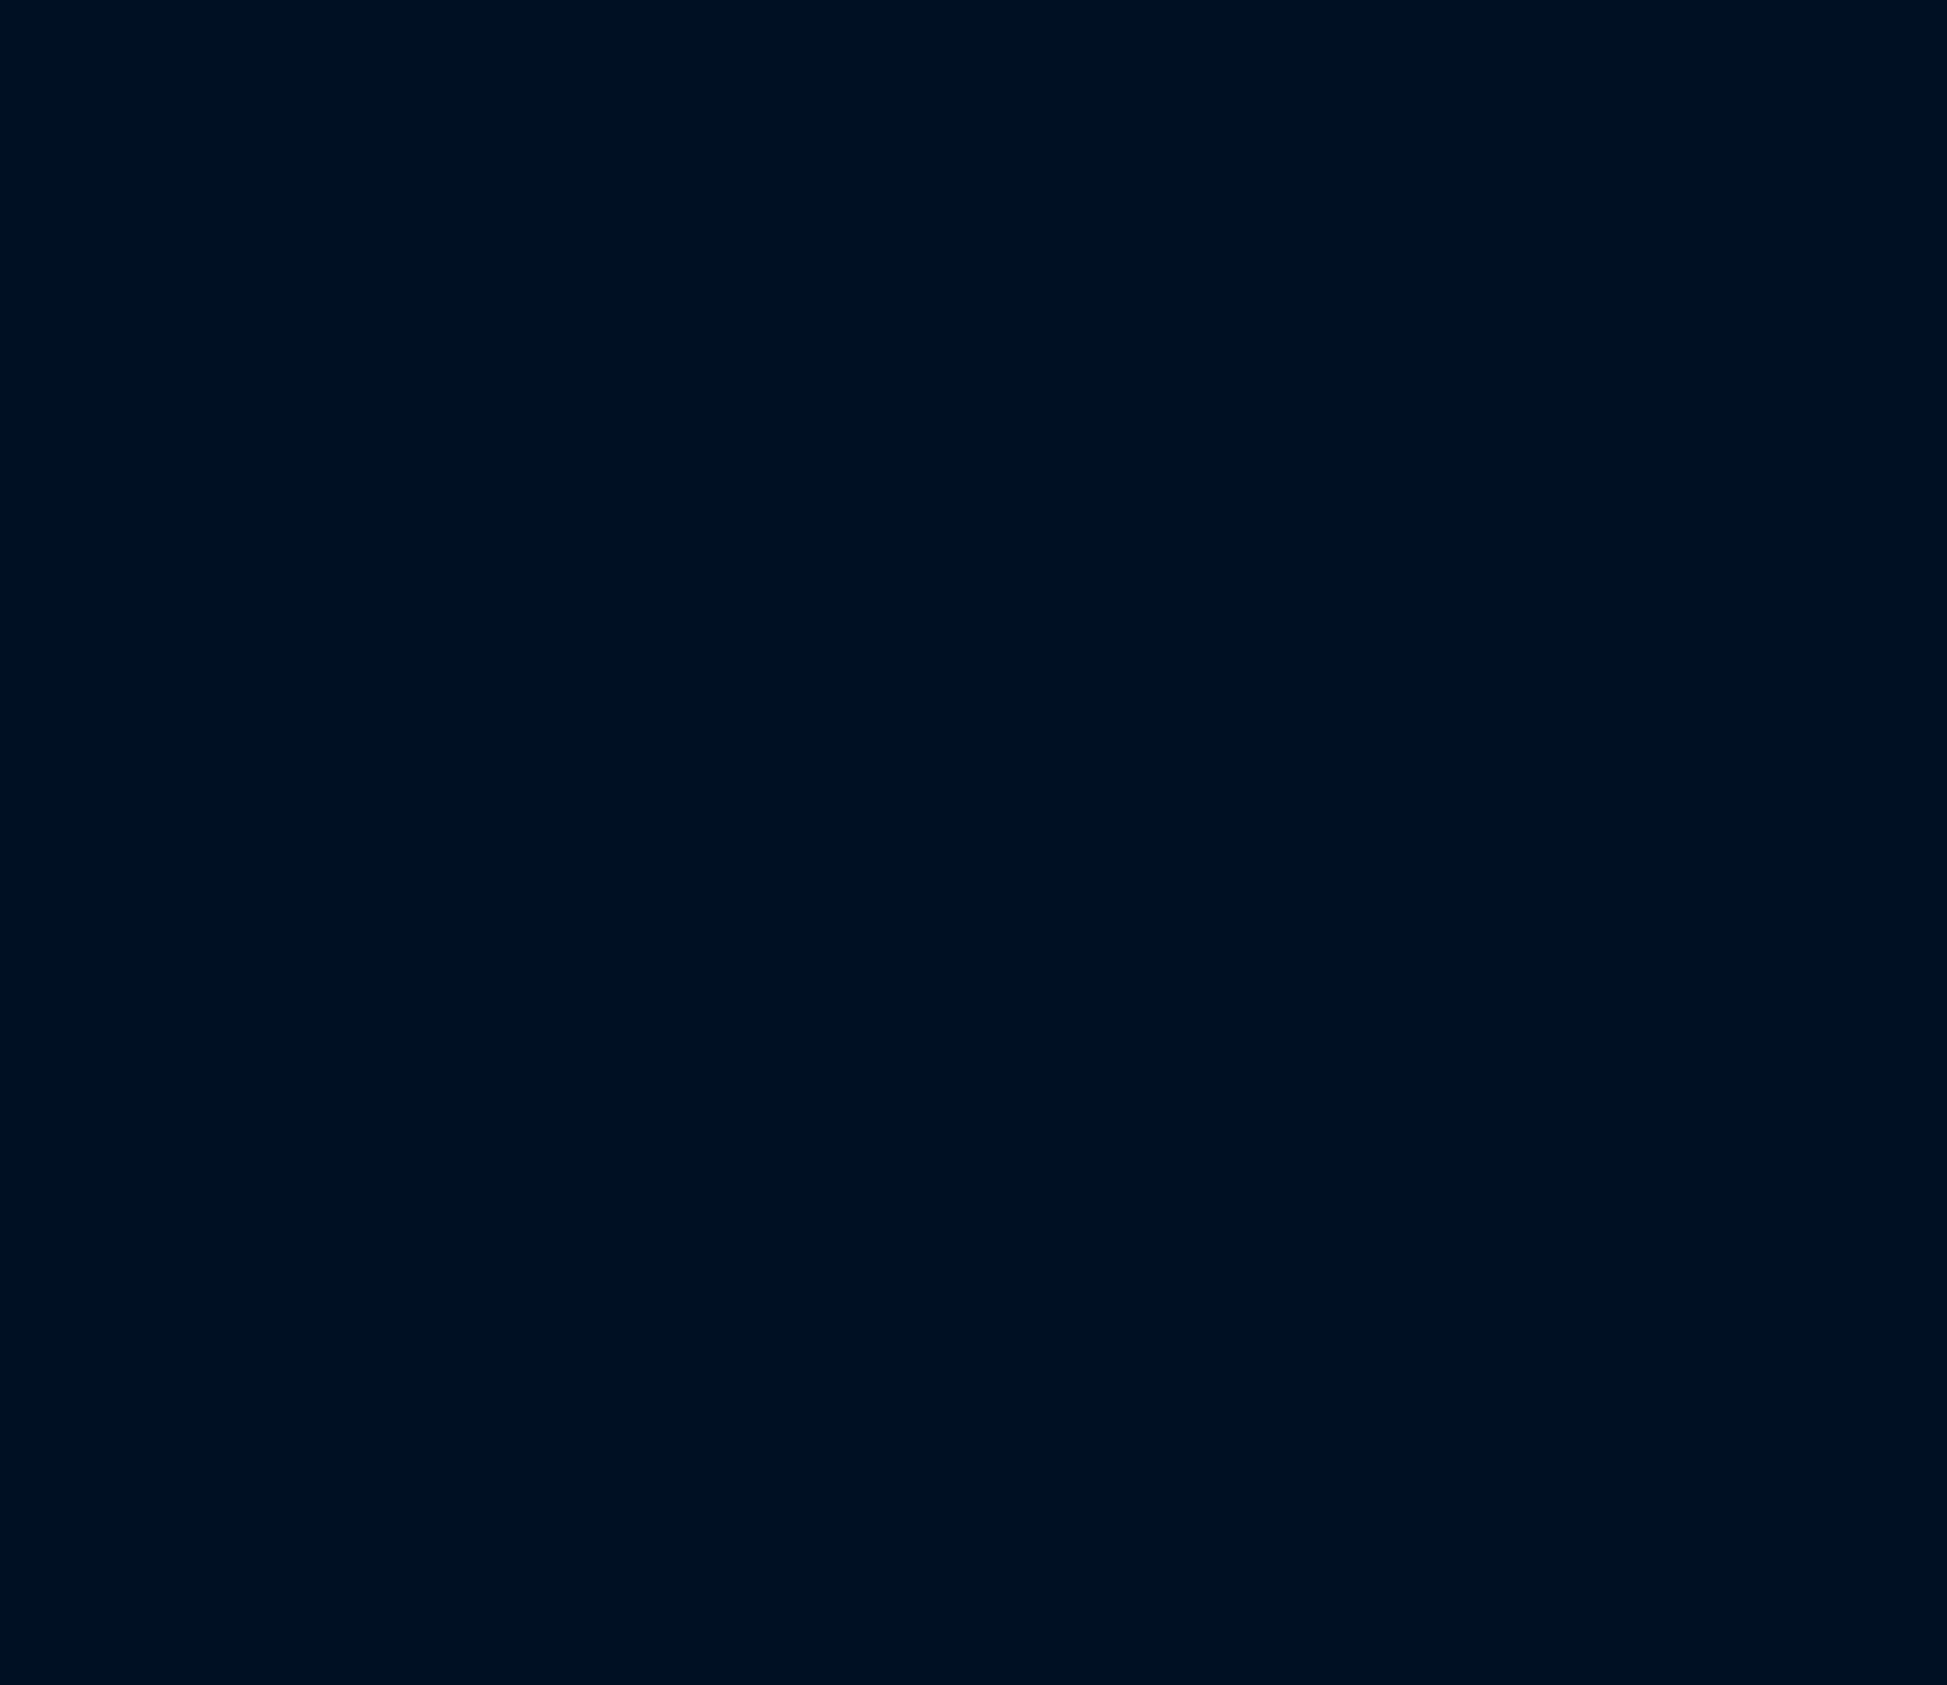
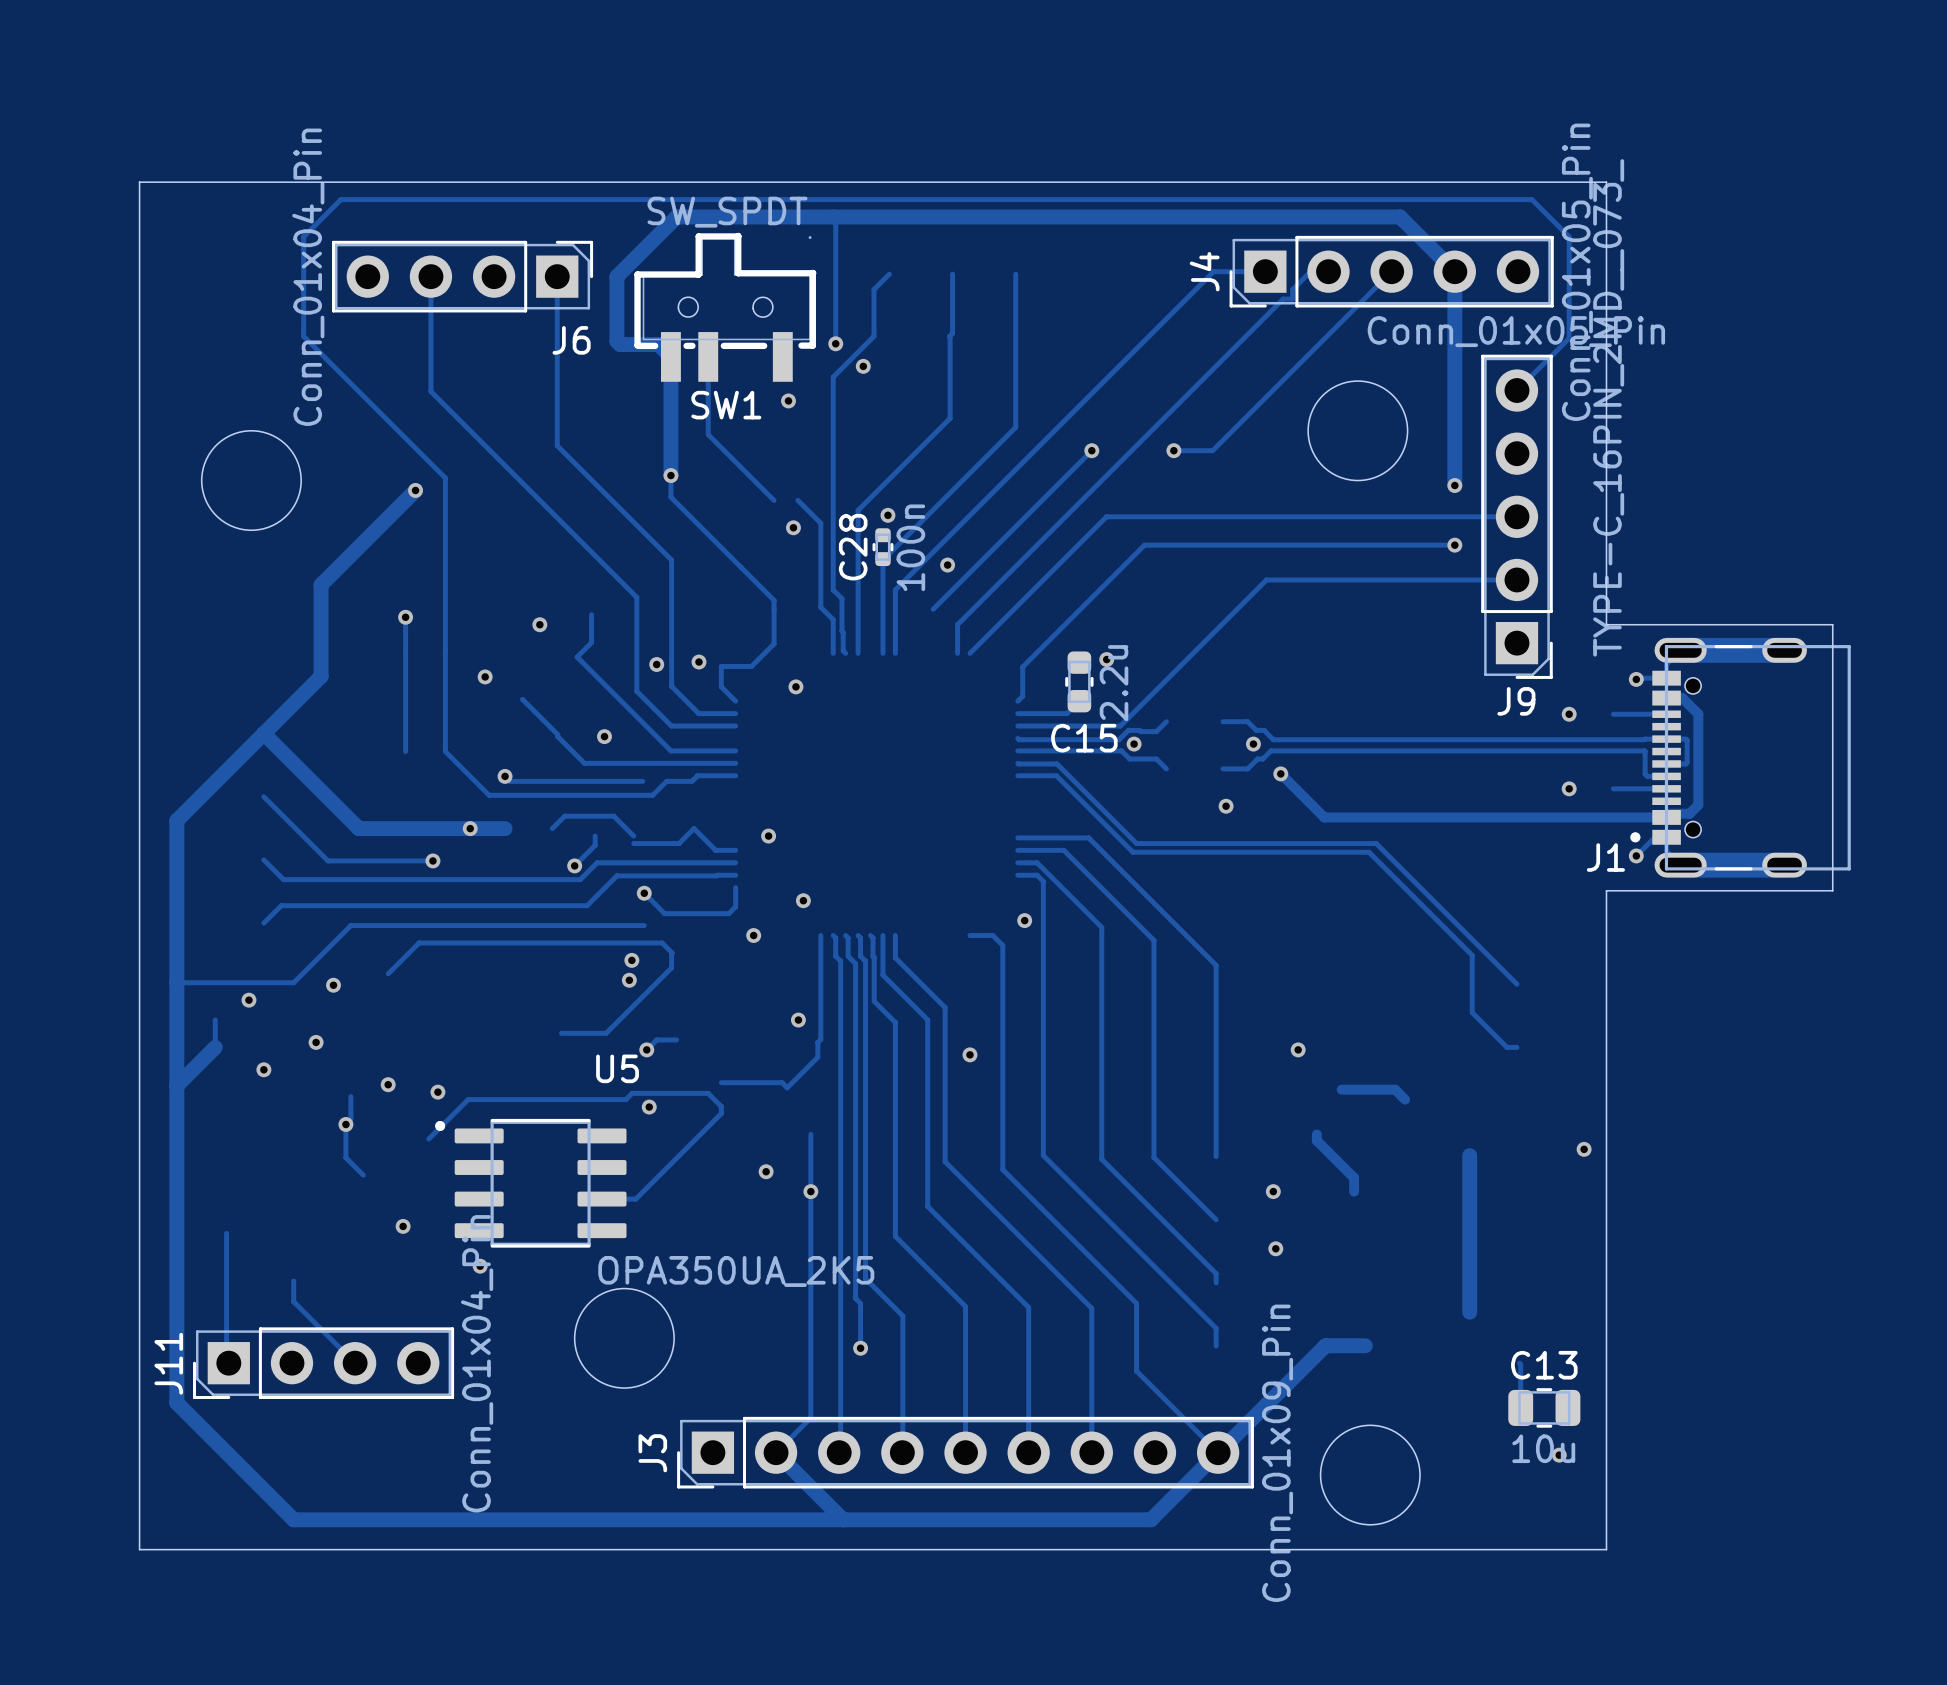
board edge: none -> (139, 182) (1606, 182) (1606, 624) (1832, 624) (1832, 890) (1606, 890) (1606, 1549) (139, 1549) (139, 182)
track: none -> (833, 216) (835, 219) (835, 343)
track: none -> (1265, 271) (1213, 271) (895, 589) (895, 653)
track: none -> (1328, 271) (1310, 271) (1292, 289) (1292, 299) (1283, 299) (957, 624) (957, 653)
track: none -> (1391, 271) (1212, 450) (1173, 450)
J4: none -> Conn_01x05_Pin (1391, 271)
track: none -> (889, 274) (874, 289) (874, 336) (833, 377) (833, 589) (841, 598) (843, 650) (845, 653)
track: none -> (952, 274) (952, 333) (949, 336) (950, 418) (858, 510) (858, 653)
track: none -> (1015, 274) (1015, 427) (882, 560) (882, 653)
track: none -> (430, 276) (430, 391) (636, 597) (636, 691) (671, 726) (735, 726)
J6: none -> Conn_01x04_Pin (462, 276)
track: none -> (557, 276) (557, 445) (671, 560) (671, 686) (698, 713) (735, 713)
SW1: none -> SW_SPDT (725, 307)
via: none -> (835, 343)
track: none -> (708, 356) (708, 434) (774, 500)
via: none -> (863, 366)
round board edge: none -> [1307, 380, 1409, 482]
track: none -> (1516, 390) (1569, 338) (1569, 236) (1531, 199) (340, 199) (303, 236) (303, 336) (445, 478) (445, 751) (489, 795) (652, 795) (666, 781) (692, 781) (697, 775) (735, 775)
via: none -> (788, 400)
round board edge: none -> [201, 430, 302, 531]
track: none -> (1091, 450) (933, 609)
via: none -> (1091, 450)
via: none -> (1173, 450)
via: none -> (670, 475)
track: none -> (1454, 485) (1454, 271) (1400, 216) (676, 216) (616, 276) (616, 341) (620, 344) (658, 344) (670, 356) (670, 497) (774, 600) (774, 643) (751, 666) (721, 666) (721, 686) (735, 701)
via: none -> (1454, 485)
track: none -> (415, 490) (321, 584) (321, 676) (176, 820) (176, 1402) (293, 1519) (1150, 1519) (1218, 1452) (1136, 1371) (1136, 1303) (1002, 1169) (1002, 945) (992, 935) (969, 935)
via: none -> (415, 490)
track: none -> (797, 500) (820, 523) (820, 607) (833, 619) (833, 653)
via: none -> (887, 515)
track: none -> (1516, 516) (1106, 516) (969, 653)
J9: none -> Conn_01x05_Pin (1516, 516)
via: none -> (793, 527)
track: none -> (1454, 545) (1144, 545) (1022, 667) (1022, 696) (1017, 701)
via: none -> (1454, 545)
C28: none -> 100n (882, 547)
via: none -> (947, 565)
track: none -> (1516, 579) (1266, 579) (1120, 726) (1017, 726)
track: none -> (591, 614) (591, 642) (577, 657) (671, 750) (735, 750)
track: none -> (405, 617) (405, 751)
via: none -> (405, 617)
via: none -> (539, 624)
track: none -> (1784, 650) (1680, 650) (1666, 664) (1666, 678) (1636, 679)
via: none -> (1106, 659)
via: none -> (698, 662)
via: none -> (656, 664)
via: none -> (485, 676)
via: none -> (1636, 679)
C15: none -> 2.2u (1079, 681)
via: none -> (795, 686)
track: none -> (1666, 698) (1682, 698) (1698, 714) (1698, 804) (1689, 813) (1670, 813) (1666, 817) (1324, 817) (1280, 773)
track: none -> (522, 699) (584, 763) (735, 763)
track: none -> (1079, 701) (1066, 713) (1017, 713)
via: none -> (1569, 714)
track: none -> (1613, 714) (1666, 714)
track: none -> (1166, 721) (1156, 731) (1128, 730) (1119, 739) (1017, 738)
track: none -> (1222, 721) (1247, 721) (1256, 730) (1264, 730) (1273, 739) (1685, 739) (1687, 762) (1666, 763)
track: none -> (263, 733) (358, 828) (505, 828)
via: none -> (604, 736)
via: none -> (1134, 744)
via: none -> (1253, 744)
track: none -> (1017, 750) (1121, 750) (1129, 759) (1156, 759) (1166, 768)
J1: none -> TYPE-C_16PIN_2MD__073_ (1740, 757)
track: none -> (1017, 763) (1057, 763) (1136, 843) (1376, 843) (1516, 984)
track: none -> (1222, 768) (1247, 768) (1257, 759) (1262, 759) (1270, 750) (1644, 750) (1645, 774) (1647, 776) (1666, 776)
via: none -> (1280, 773)
track: none -> (1017, 775) (1056, 775) (1132, 852) (1369, 852) (1472, 955) (1472, 1012) (1507, 1047) (1516, 1047)
track: none -> (505, 776) (510, 781) (642, 781)
via: none -> (505, 776)
via: none -> (1569, 788)
track: none -> (1613, 788) (1666, 788)
track: none -> (263, 796) (328, 860) (432, 860)
via: none -> (1226, 806)
via: none -> (470, 828)
track: none -> (552, 828) (564, 816) (613, 816) (633, 836)
track: none -> (595, 836) (595, 845) (574, 865)
via: none -> (768, 836)
track: none -> (1017, 837) (1088, 837) (1216, 965) (1216, 1156)
track: none -> (633, 843) (679, 843) (694, 828) (715, 850) (735, 850)
track: none -> (1017, 850) (1063, 850) (1153, 940) (1153, 1157) (1216, 1219)
track: none -> (1636, 855) (1654, 837) (1666, 837) (1666, 851) (1680, 865) (1784, 865)
via: none -> (1636, 855)
track: none -> (263, 859) (283, 879) (580, 879) (597, 862) (735, 862)
via: none -> (432, 860)
track: none -> (1017, 862) (1037, 862) (1101, 927) (1101, 1159) (1216, 1273) (1216, 1282)
via: none -> (574, 865)
track: none -> (735, 875) (616, 875) (587, 905) (281, 905) (263, 923)
track: none -> (1017, 875) (1037, 875) (1043, 881) (1043, 1155) (1216, 1328) (1216, 1346)
track: none -> (735, 887) (735, 906) (728, 913) (664, 913) (644, 893)
via: none -> (644, 893)
via: none -> (803, 900)
via: none -> (1024, 920)
track: none -> (644, 925) (350, 925) (293, 982) (176, 982)
via: none -> (753, 935)
track: none -> (820, 935) (820, 1039) (817, 1042) (817, 1057) (787, 1087) (782, 1082) (721, 1082)
track: none -> (833, 935) (835, 937) (835, 956) (840, 961) (839, 1452)
track: none -> (845, 935) (848, 937) (848, 956) (855, 963) (855, 1298) (860, 1303) (860, 1348)
track: none -> (858, 935) (860, 937) (860, 956) (865, 961) (865, 1278) (902, 1315) (902, 1452)
track: none -> (870, 935) (873, 937) (874, 957) (874, 1001) (895, 1022) (895, 1236) (965, 1306) (965, 1452)
track: none -> (882, 935) (882, 975) (927, 1019) (927, 1206) (1028, 1307) (1028, 1452)
track: none -> (895, 935) (895, 957) (945, 1007) (945, 1161) (1091, 1308) (1091, 1452)
via: none -> (631, 960)
track: none -> (388, 973) (419, 942) (662, 942) (672, 952) (671, 967) (606, 1033) (561, 1033)
via: none -> (629, 980)
via: none -> (333, 985)
via: none -> (248, 1000)
track: none -> (215, 1020) (215, 1047) (176, 1085)
via: none -> (798, 1020)
track: none -> (676, 1039) (656, 1039) (646, 1049)
via: none -> (316, 1042)
via: none -> (646, 1049)
via: none -> (1298, 1049)
via: none -> (969, 1054)
via: none -> (263, 1069)
via: none -> (388, 1084)
track: none -> (1341, 1089) (1395, 1089) (1405, 1099)
via: none -> (437, 1092)
track: none -> (350, 1096) (350, 1119) (345, 1124) (345, 1157) (363, 1175)
via: none -> (649, 1107)
via: none -> (345, 1124)
track: none -> (810, 1134) (810, 1417) (776, 1452) (843, 1519)
track: none -> (1316, 1134) (1316, 1140) (1354, 1177) (1354, 1191)
track: none -> (428, 1139) (468, 1099) (625, 1099) (632, 1093) (708, 1093) (721, 1106) (721, 1113) (635, 1199) (602, 1199)
via: none -> (1584, 1149)
track: none -> (1469, 1155) (1469, 1312)
via: none -> (766, 1171)
U5: none -> OPA350UA_2K5 (530, 1183)
via: none -> (810, 1191)
via: none -> (1273, 1191)
via: none -> (403, 1226)
track: none -> (226, 1233) (226, 1360) (228, 1363)
via: none -> (1275, 1248)
via: none -> (480, 1266)
track: none -> (293, 1281) (293, 1301) (355, 1363)
round board edge: none -> [574, 1287, 675, 1389]
track: none -> (1365, 1345) (1325, 1345) (1218, 1452)
via: none -> (860, 1348)
J11: none -> Conn_01x04_Pin (323, 1363)
track: none -> (1519, 1363) (1520, 1407)
C13: none -> 10u (1544, 1407)
round board edge: none -> [1319, 1424, 1421, 1526]
J3: none -> Conn_01x09_Pin (965, 1452)
via: none -> (1559, 1455)

